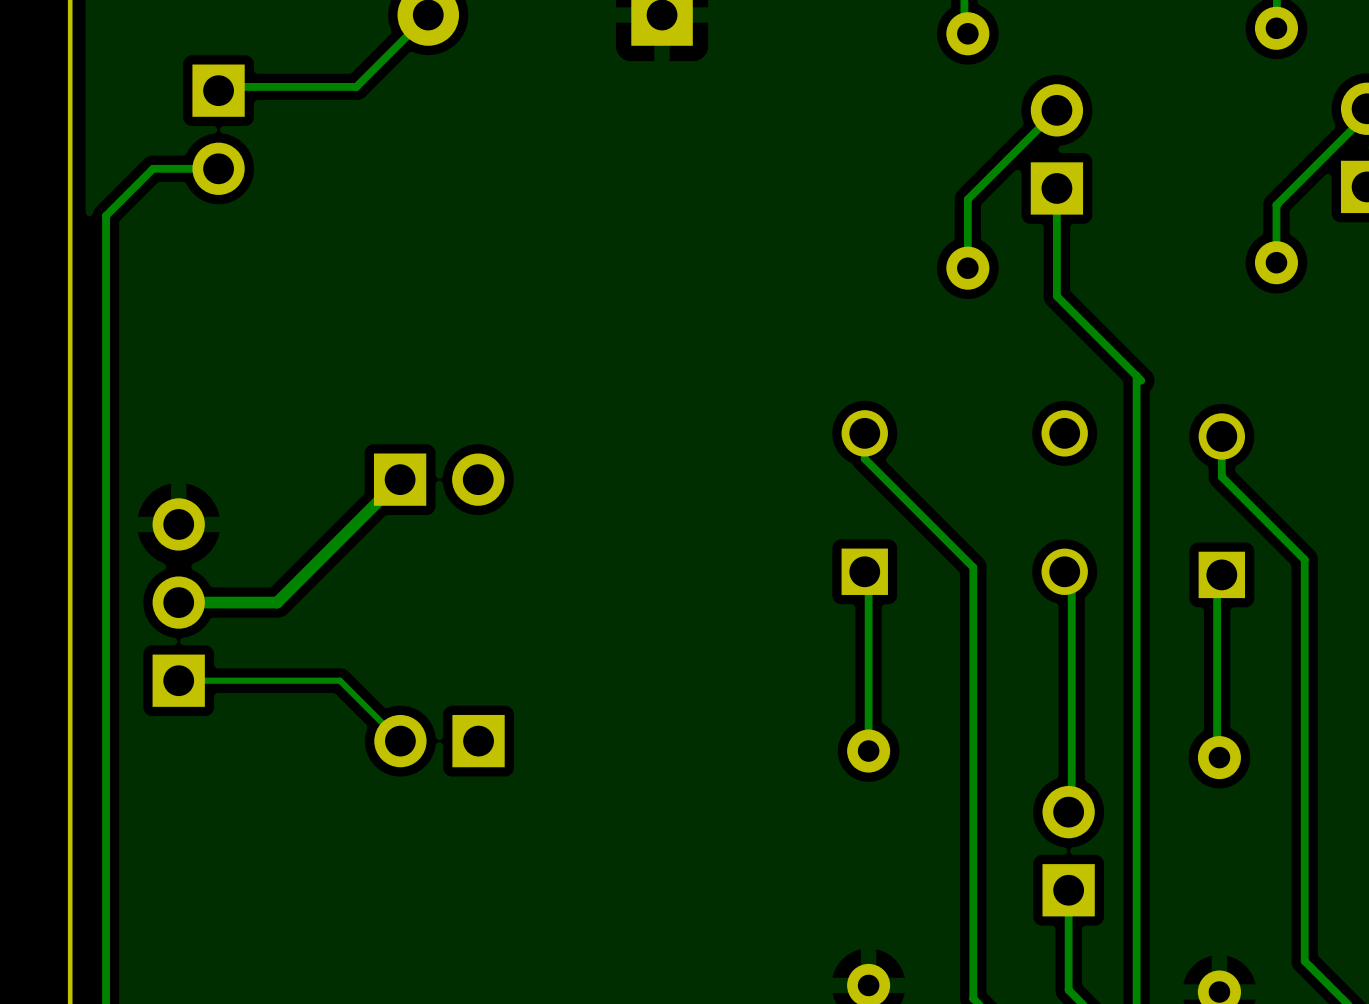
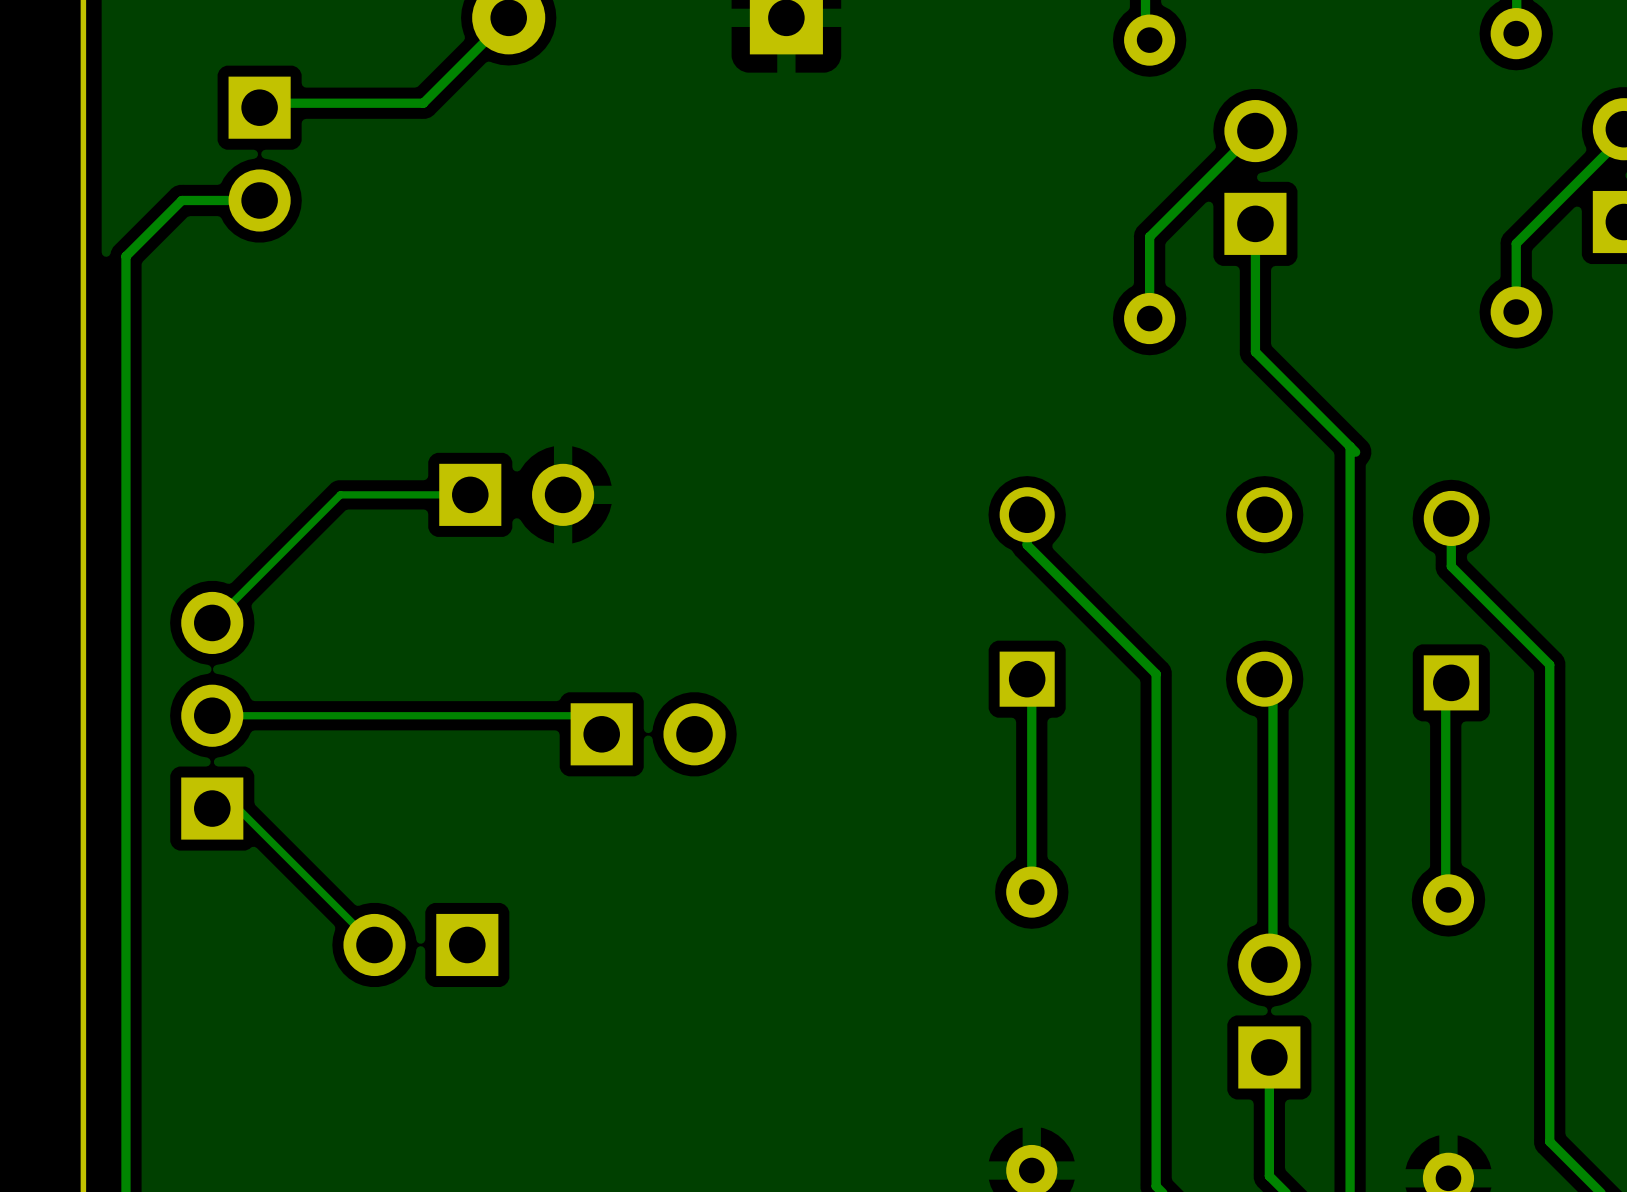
track: none -> (474, 490) (470, 494) (340, 494) (212, 622)
track: (400, 479) (277, 602) -> (601, 734) (583, 715) (329, 715)
part position: (439, 479) -> (516, 494)
track width: thick (277, 602) (178, 602) -> thin (329, 715) (212, 715)
part: none -> (648, 734)
track: (200, 680) (340, 680) (400, 741) -> (238, 808) (374, 944)
part: (439, 741) -> none
part: none -> (420, 944)

